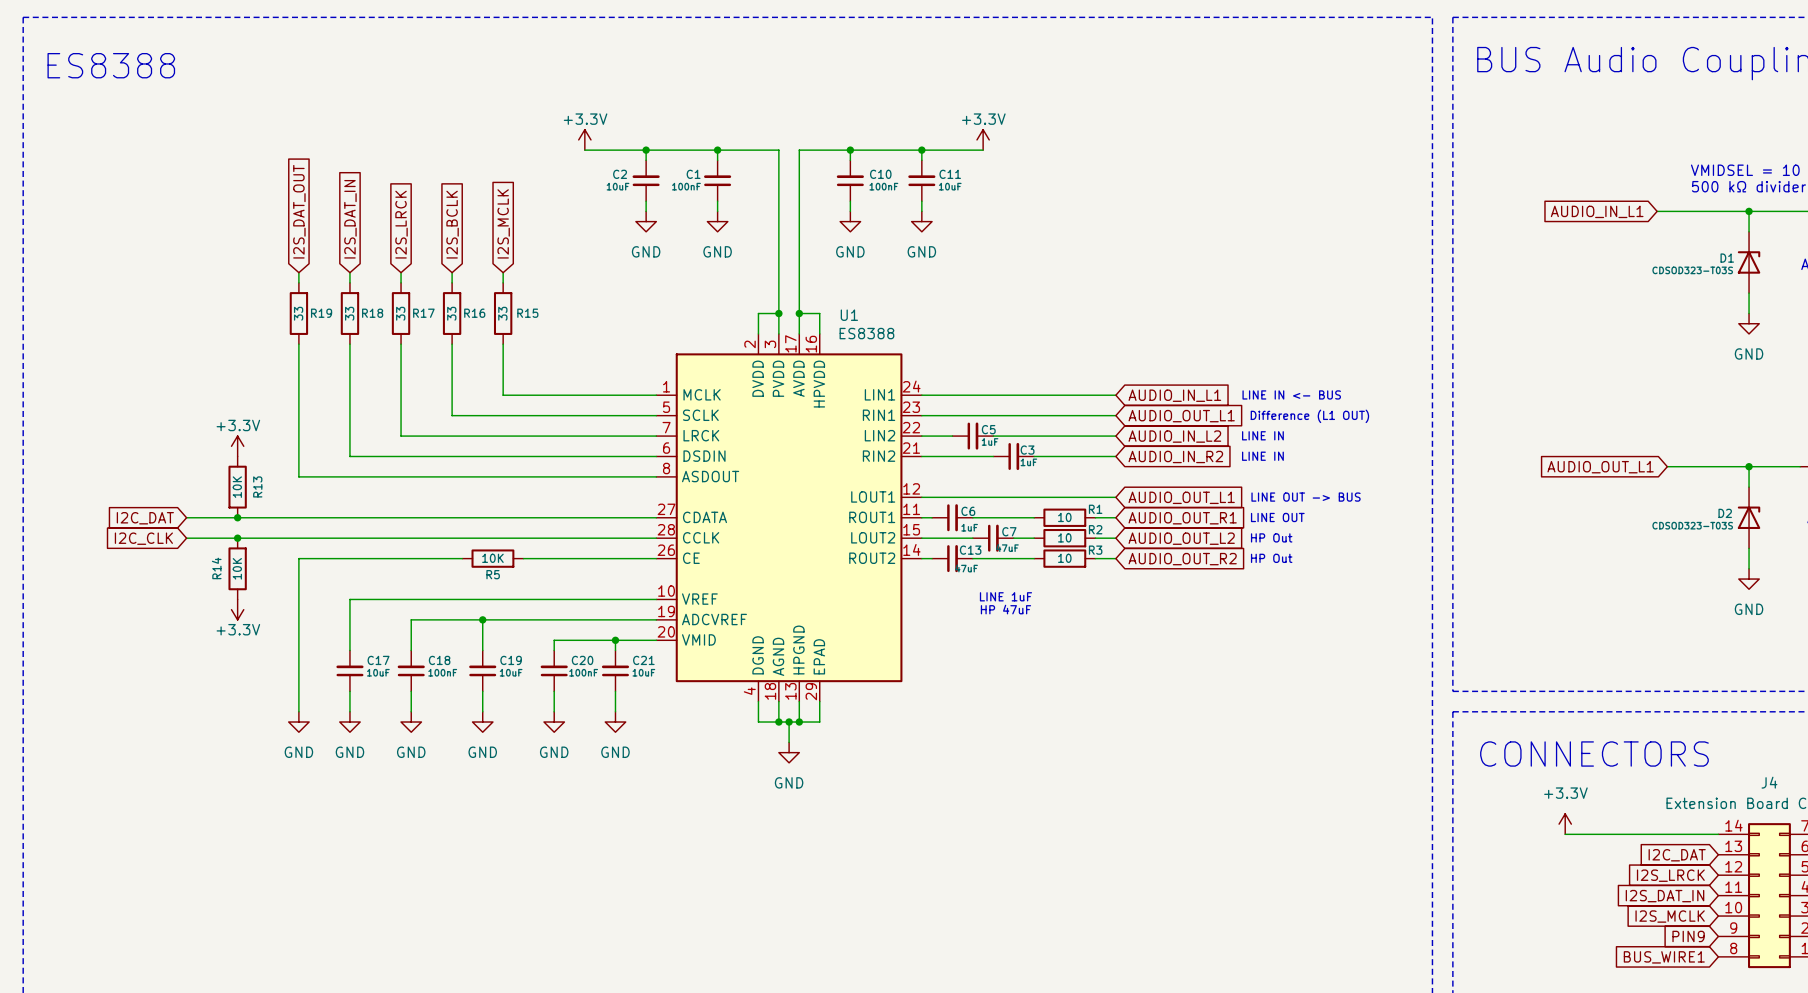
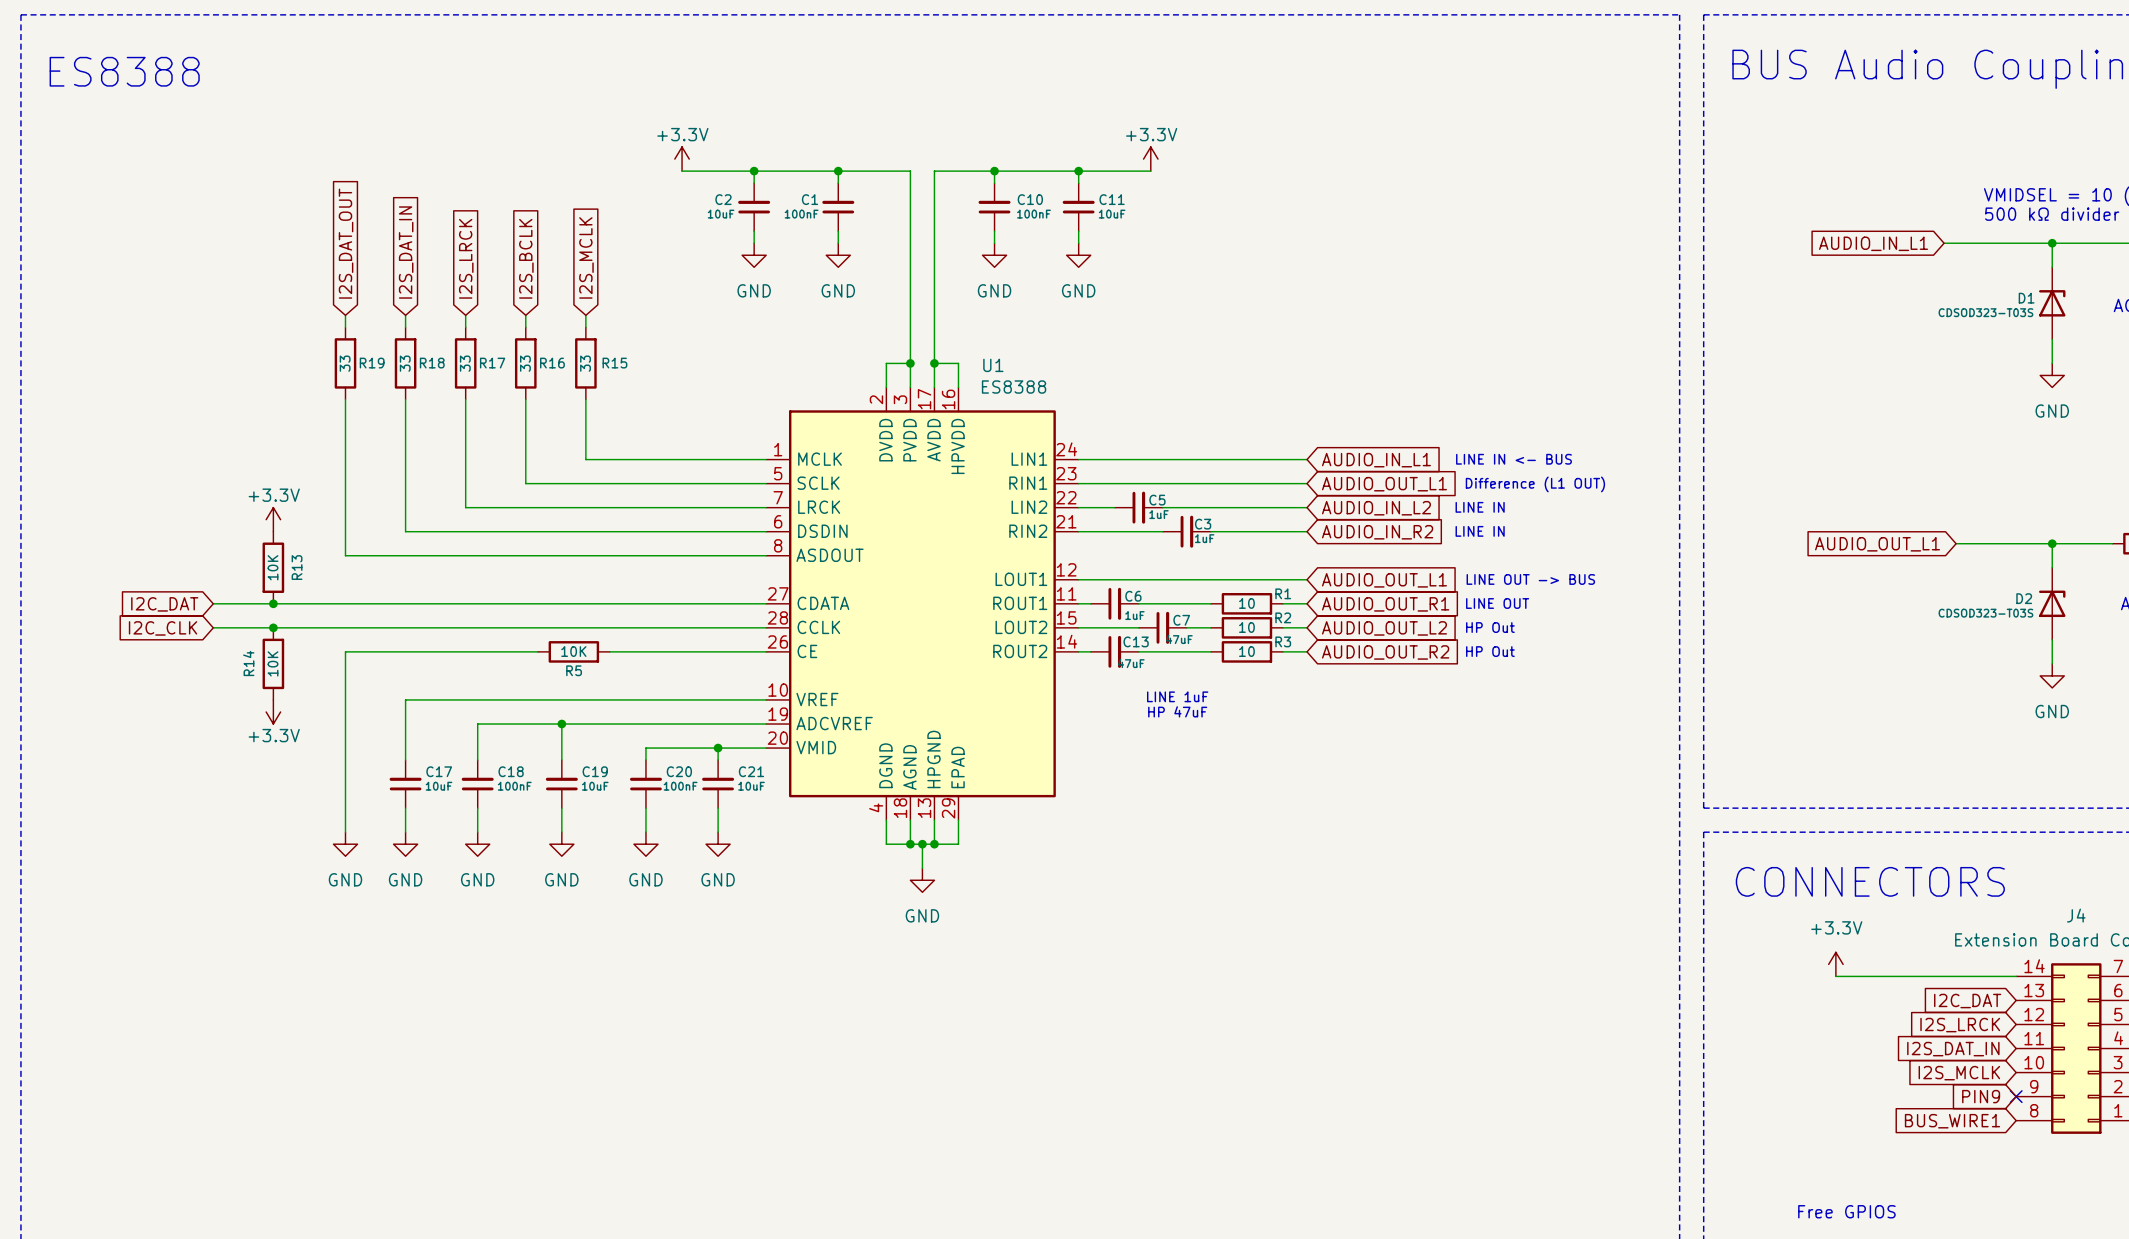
no-connect mark: none -> (2016, 1096)

